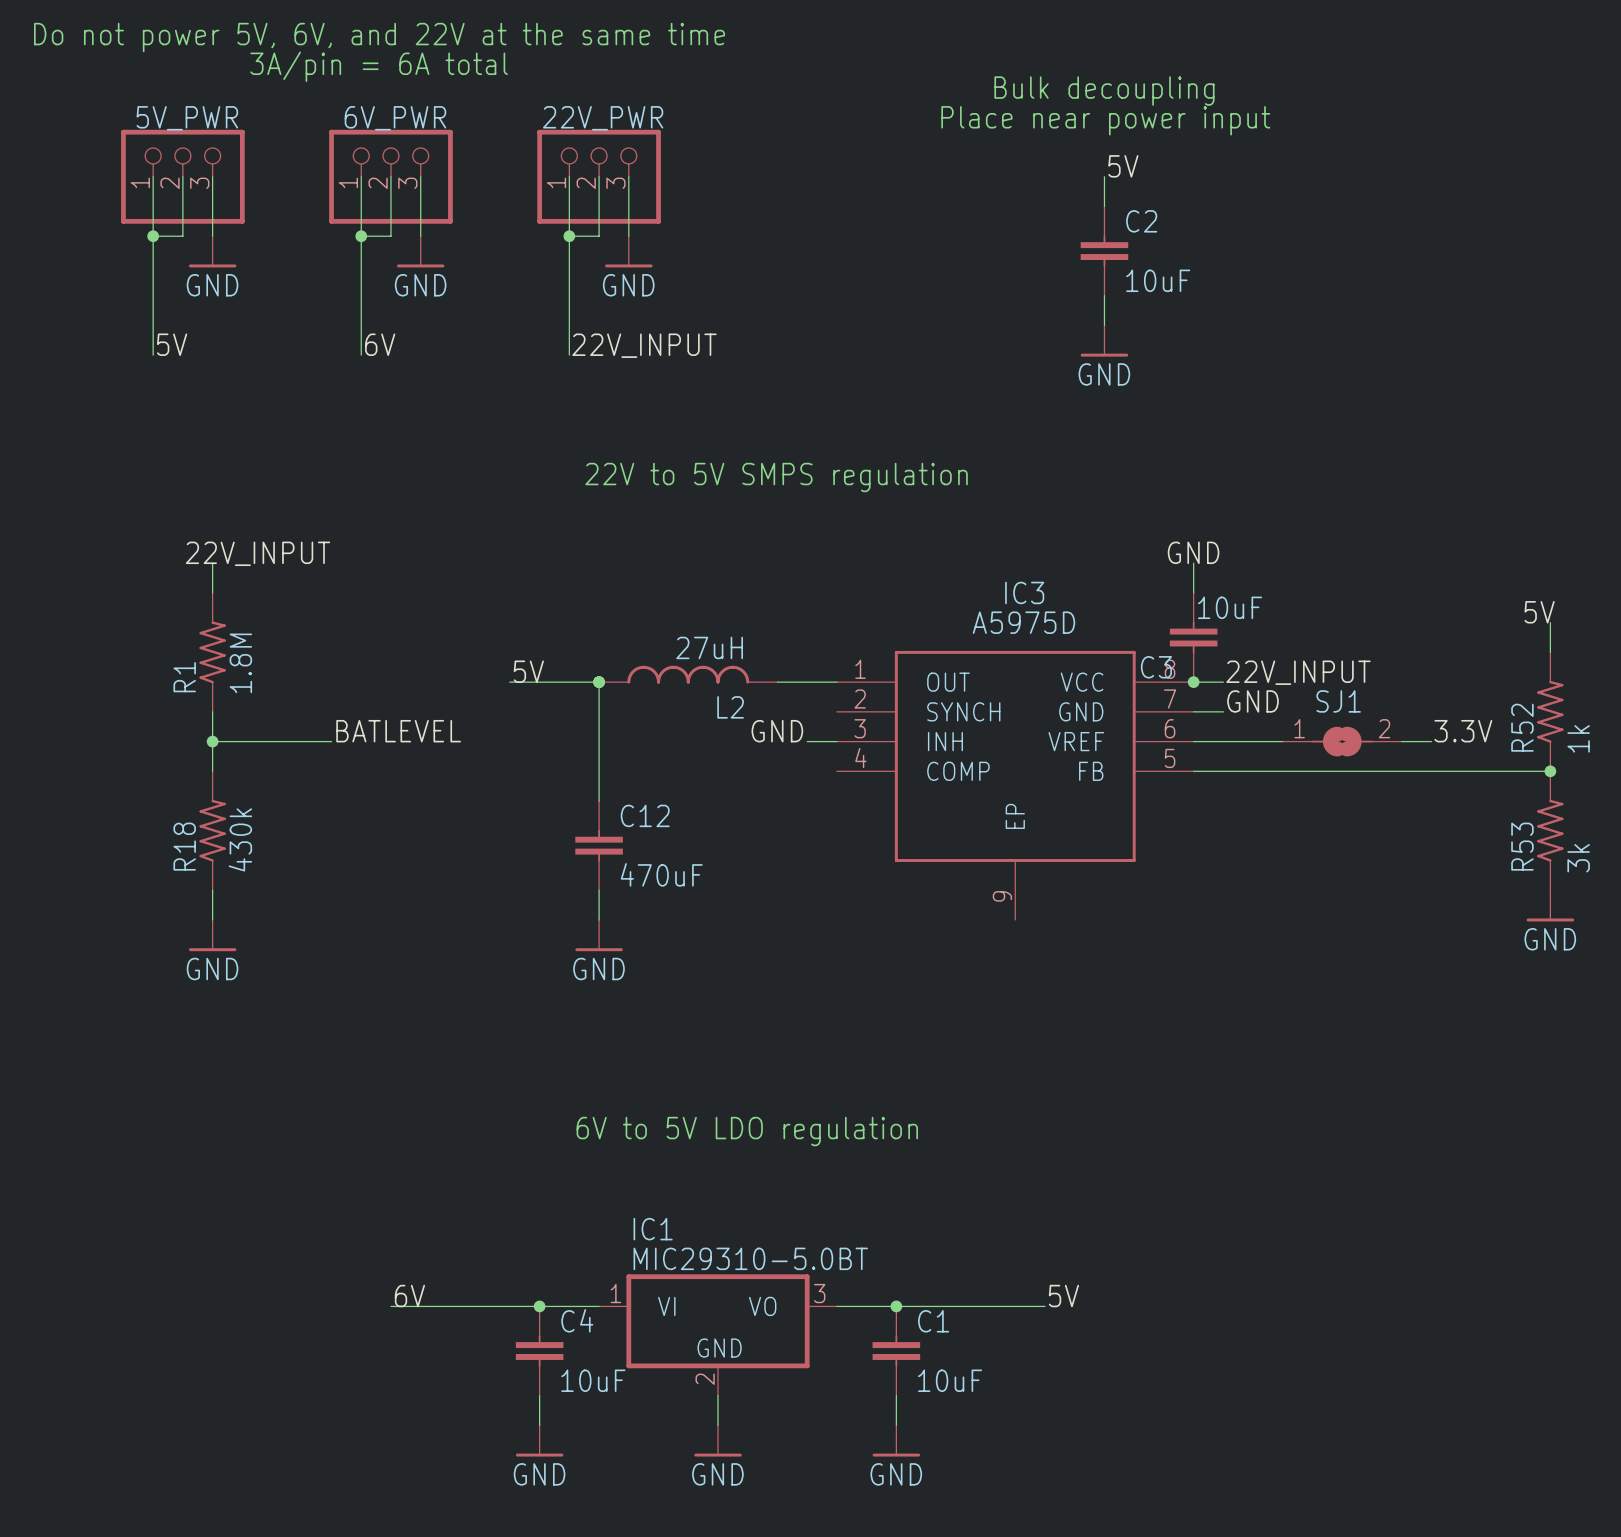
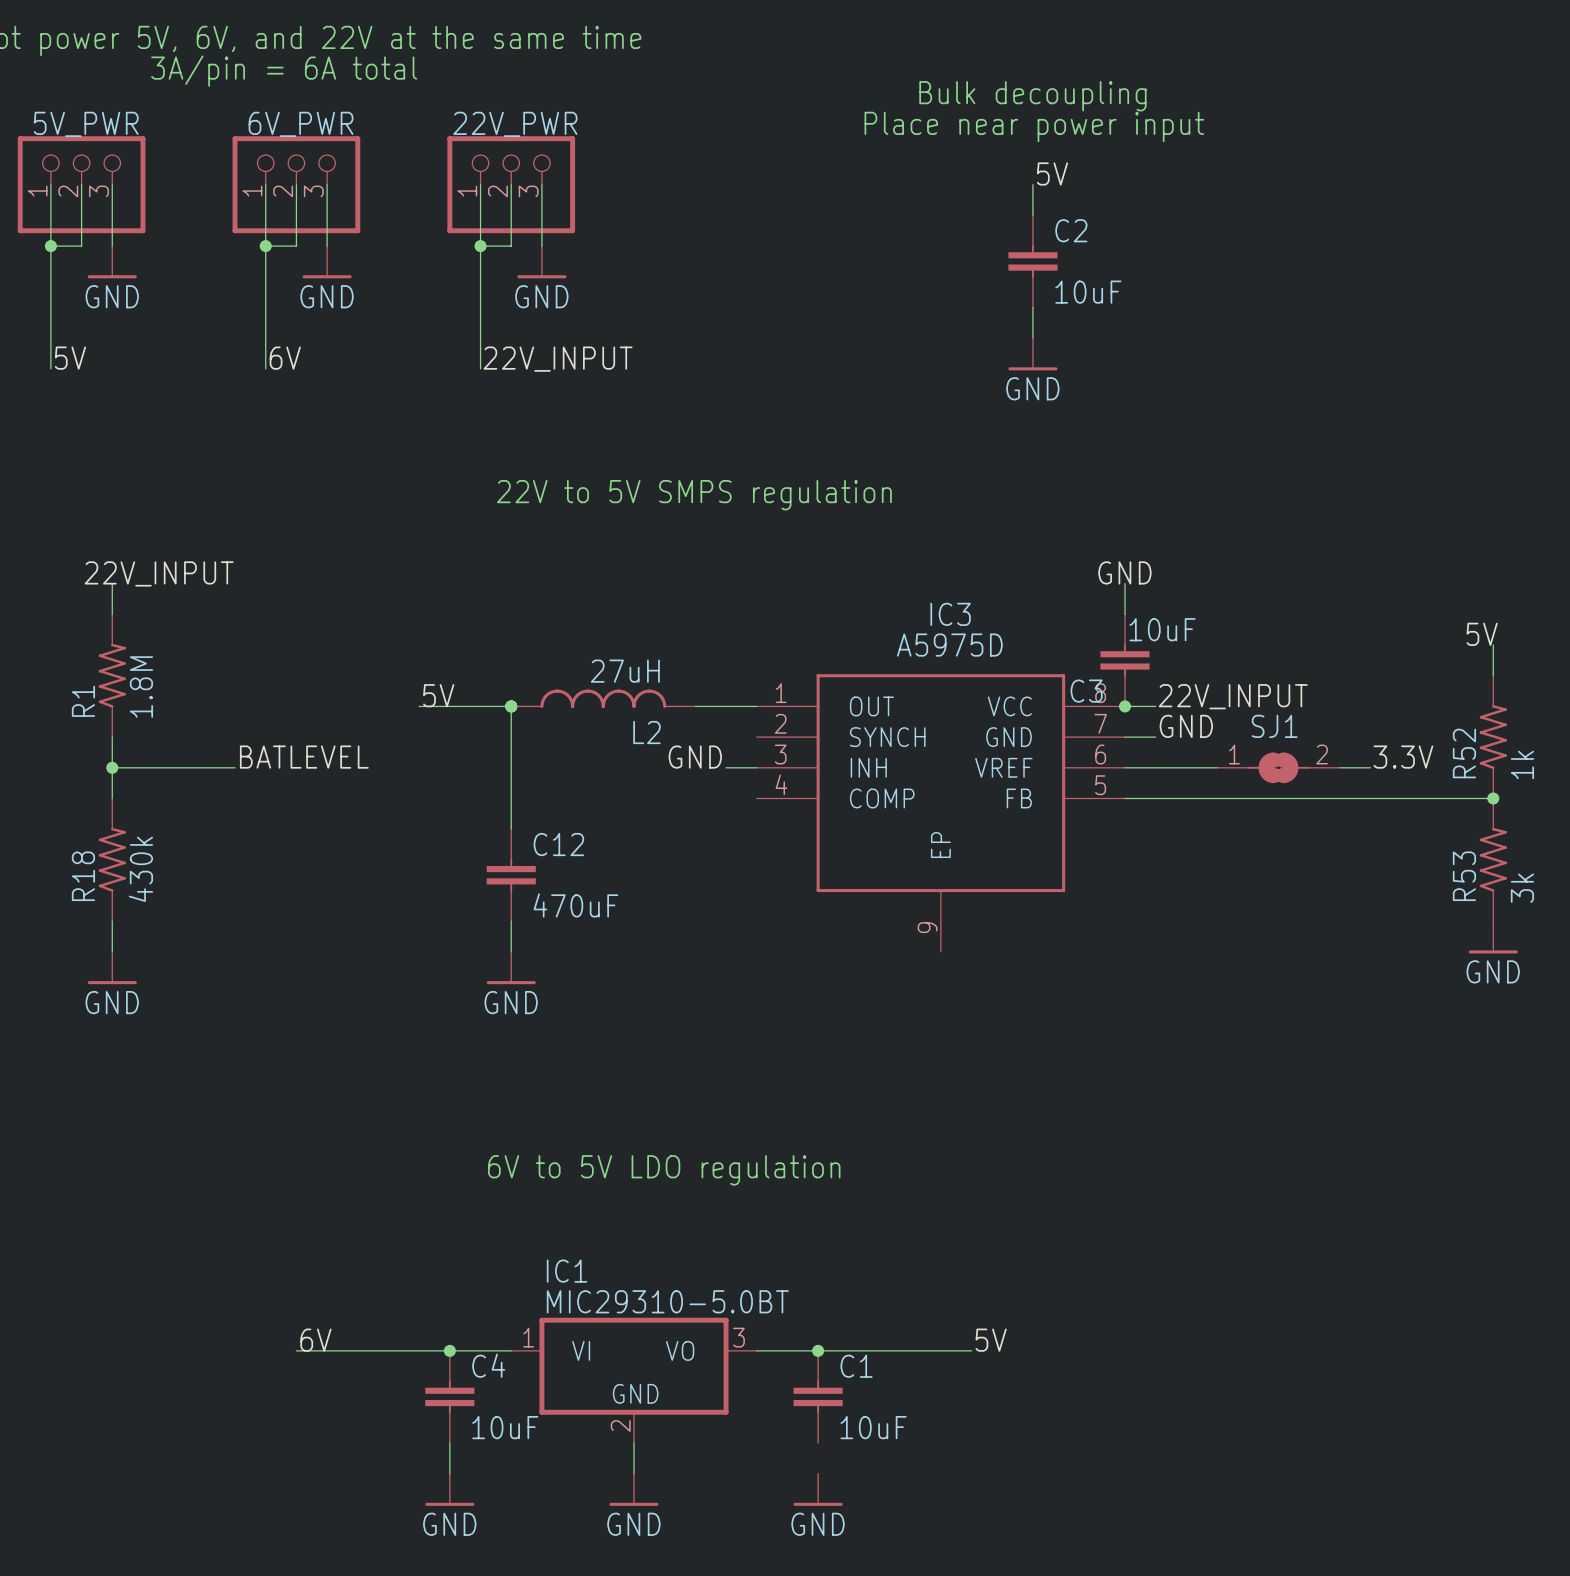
wire: (896, 1395) (896, 1425) -> none

